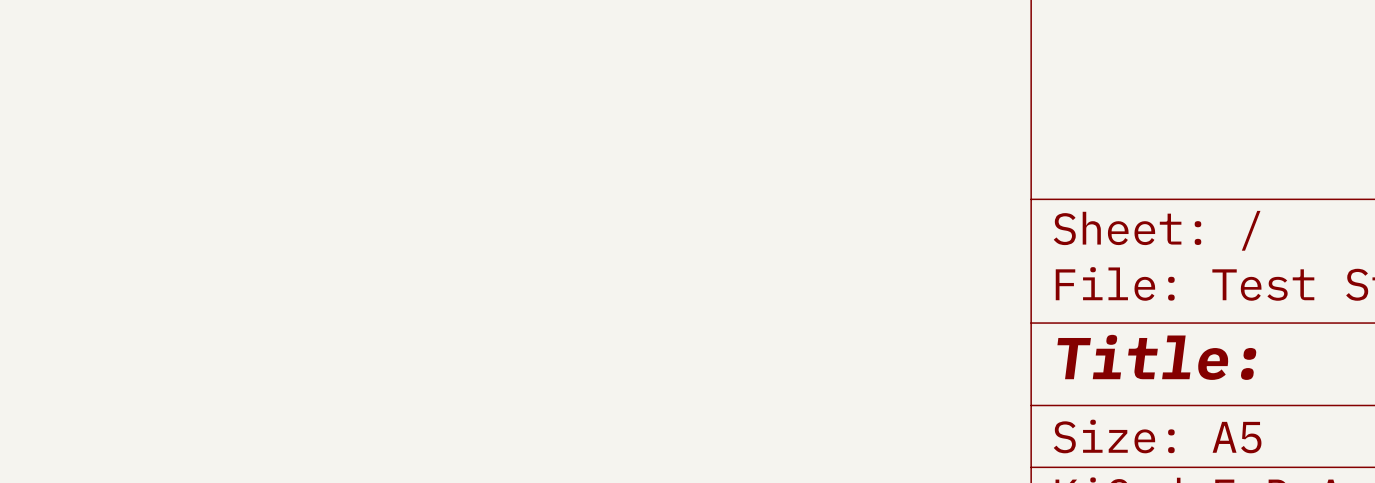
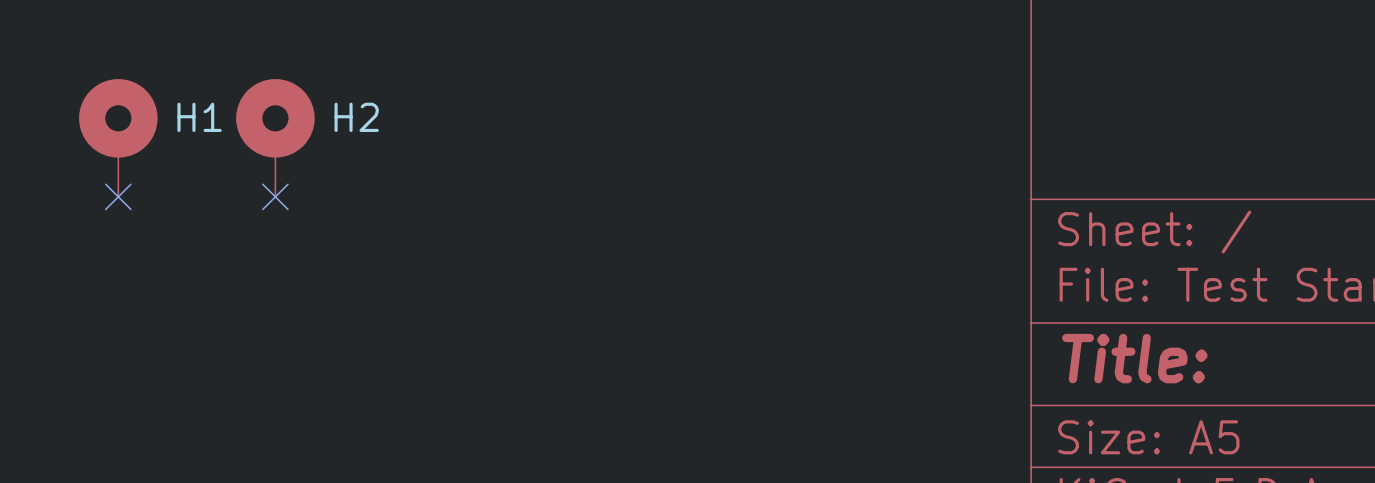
H1: none -> (118, 137)
H2: none -> (275, 137)
no-connect mark: none -> (118, 196)
no-connect mark: none -> (275, 196)

